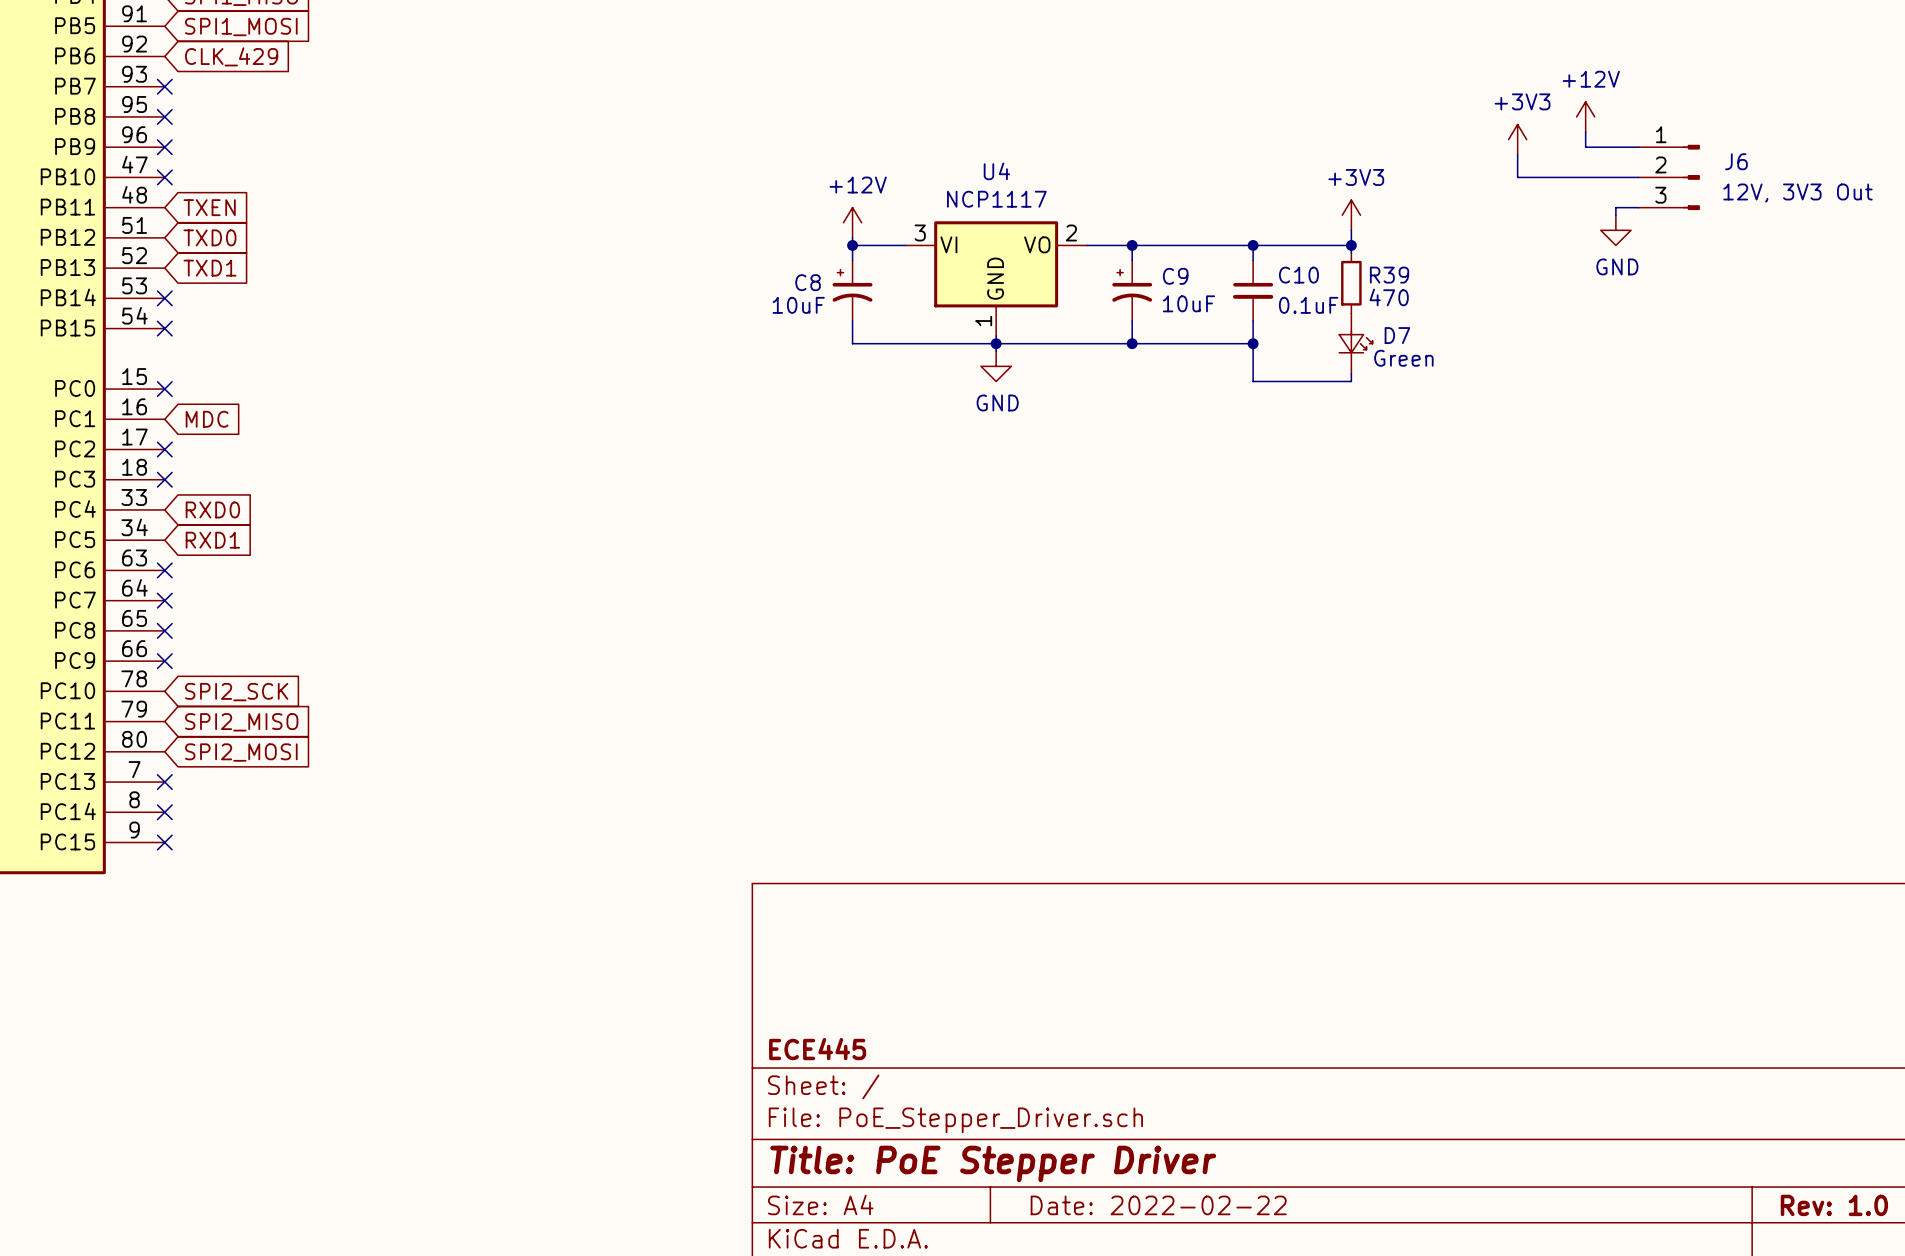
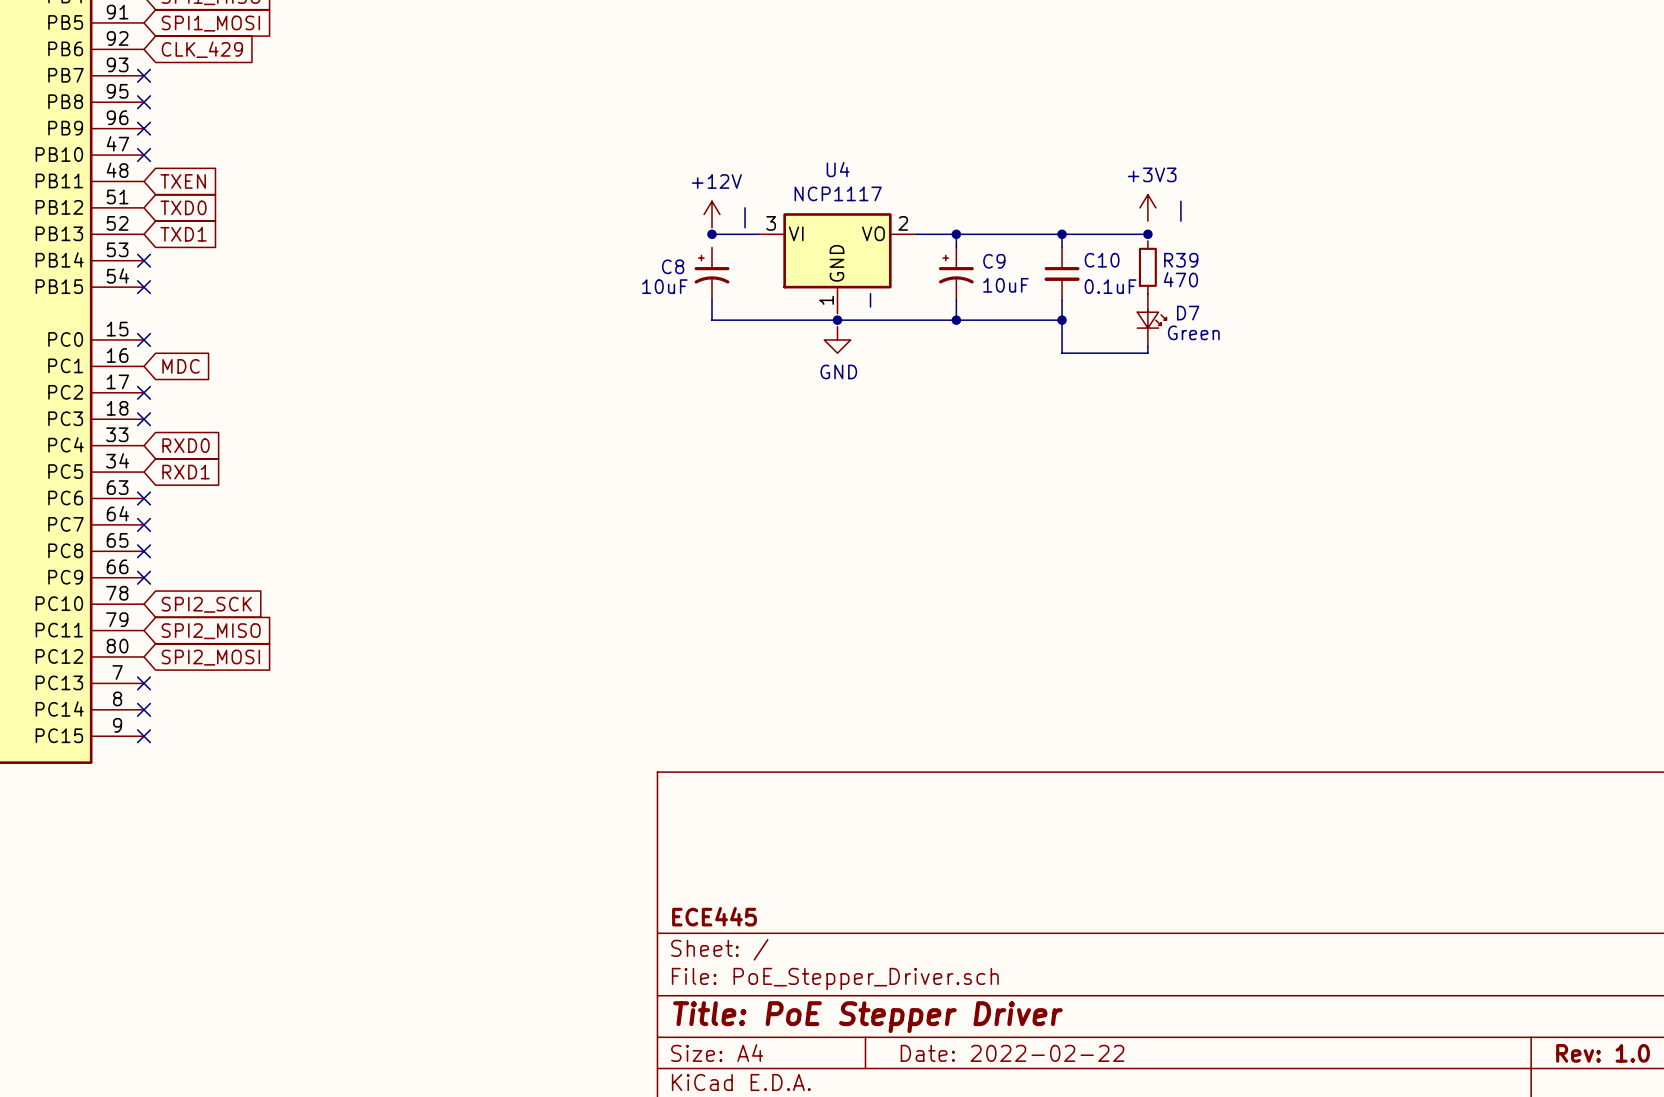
power symbol: +12V (1585, 116) -> none
wire: (1585, 132) (1585, 147) (1638, 147) -> none
power symbol: +3V3 (1517, 139) -> none
wire: (1517, 154) (1517, 177) (1638, 177) -> none
J6: 12V, 3V3 Out (1669, 177) -> none
wire: (1638, 207) (1615, 207) (1615, 215) -> none
power symbol position: +3V3 (1351, 215) -> +3V3 (1147, 207)
power symbol position: +12V (852, 222) -> +12V (712, 214)
power symbol: GND (1615, 230) -> none
wire: (852, 245) (905, 245) -> (712, 234) (758, 234)
junction position: (852, 245) -> (712, 234)
wire: (1086, 245) (1351, 245) -> (916, 234) (1147, 234)
wire: (1132, 245) (1132, 260) -> (956, 234) (956, 247)
junction: (1132, 245) -> none
wire: (1253, 245) (1253, 260) -> (1062, 234) (1062, 247)
junction: (1253, 245) -> none
junction: (1351, 245) -> none
junction: none -> (956, 234)
junction: none -> (1062, 234)
junction: none -> (1147, 234)
U4 position: (996, 278) -> (837, 263)
R39 position: (1351, 283) -> (1147, 267)
C8 position: (852, 290) -> (712, 273)
C9 position: (1132, 290) -> (956, 273)
C10 position: (1253, 290) -> (1062, 273)
wire: (852, 321) (852, 343) (1253, 343) -> (712, 300) (712, 320) (1062, 320)
wire: (1132, 321) (1132, 343) -> (956, 300) (956, 320)
wire: (1253, 321) (1253, 381) (1351, 381) (1351, 373) -> (1062, 300) (1062, 353) (1147, 353) (1147, 346)
junction position: (996, 343) -> (837, 320)
junction: (1132, 343) -> none
junction: (1253, 343) -> none
D7 position: (1355, 343) -> (1151, 320)
power symbol position: GND (996, 366) -> GND (837, 339)
junction: none -> (956, 320)
junction: none -> (1062, 320)

